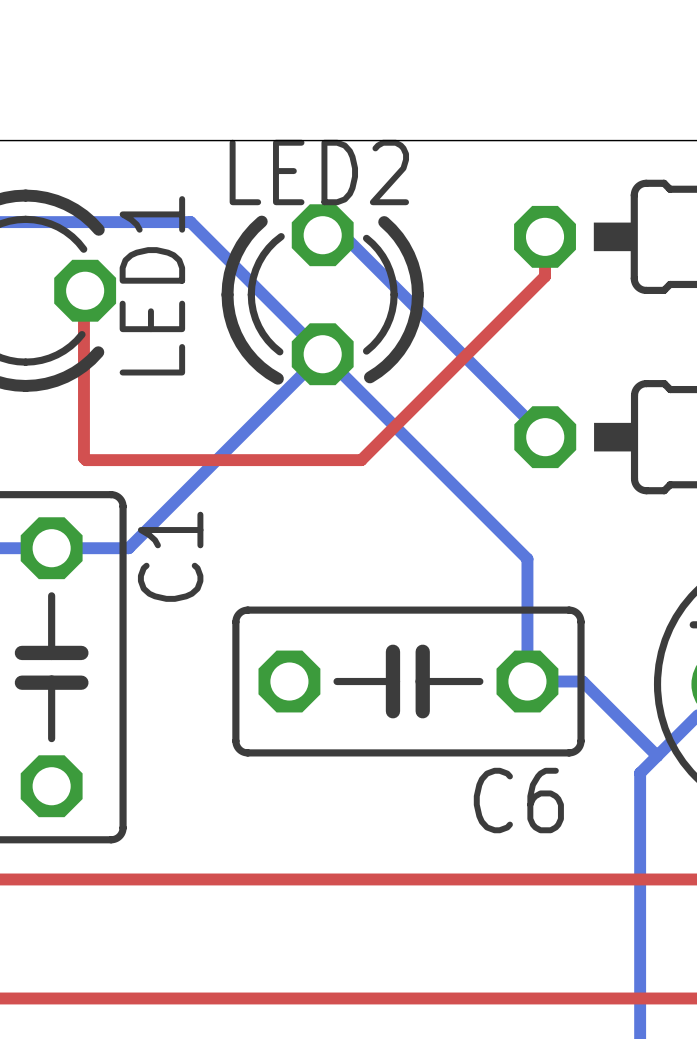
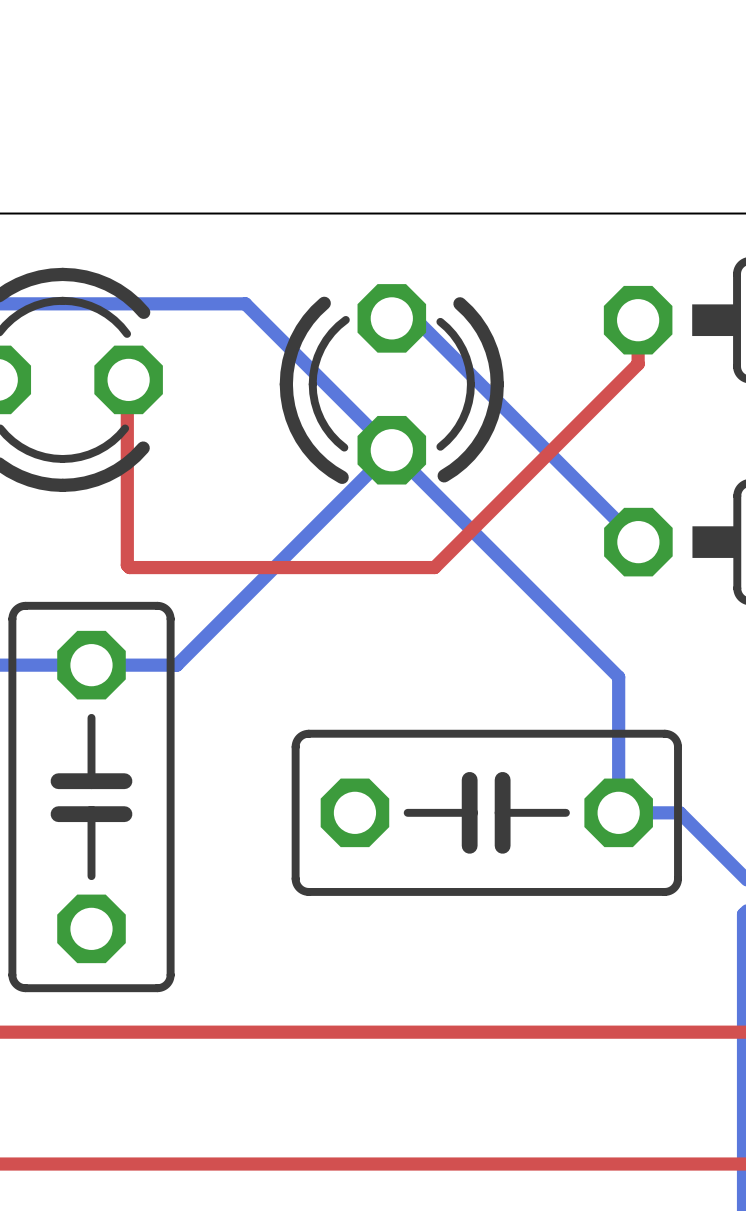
LED2 name: LED2 (319, 172) -> none
LED1 name: LED1 (152, 285) -> none
C1 name: C1 (170, 556) -> none
C6 name: C6 (518, 800) -> none

